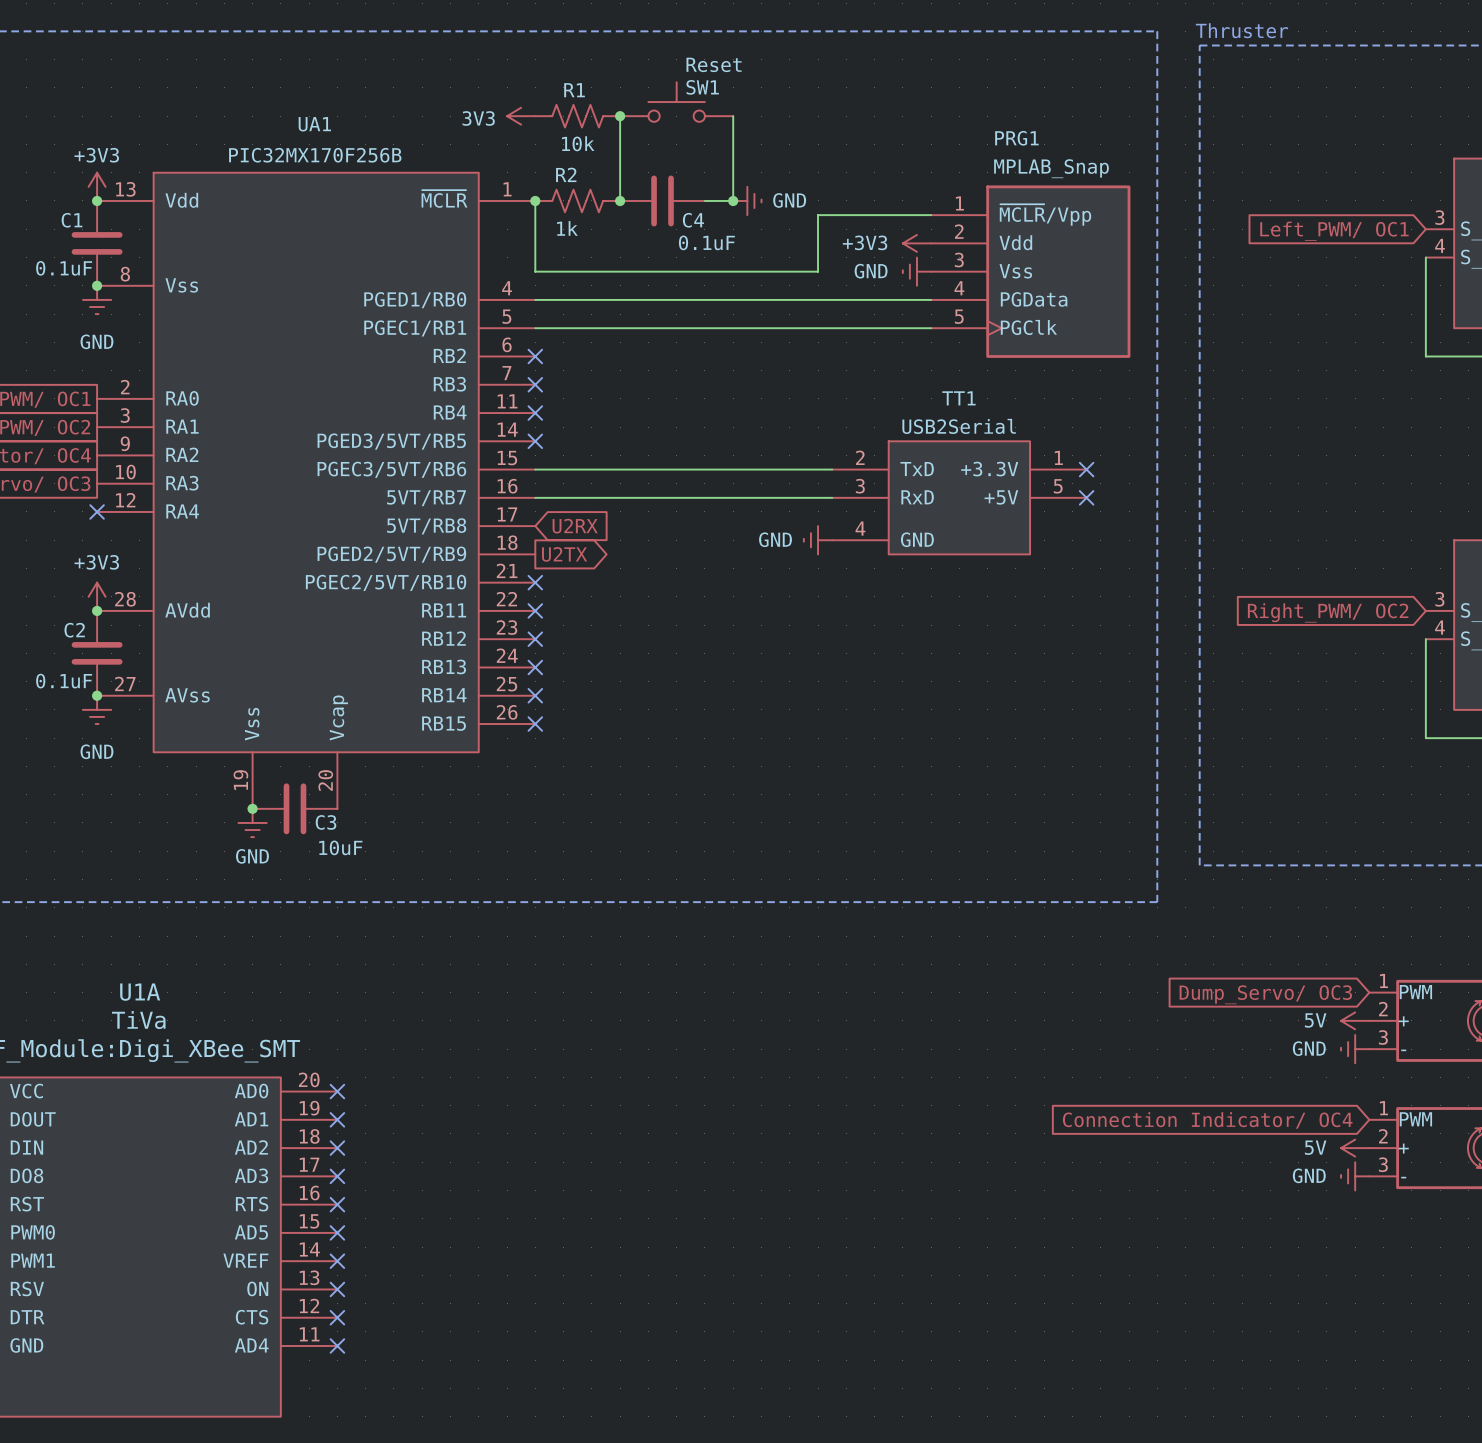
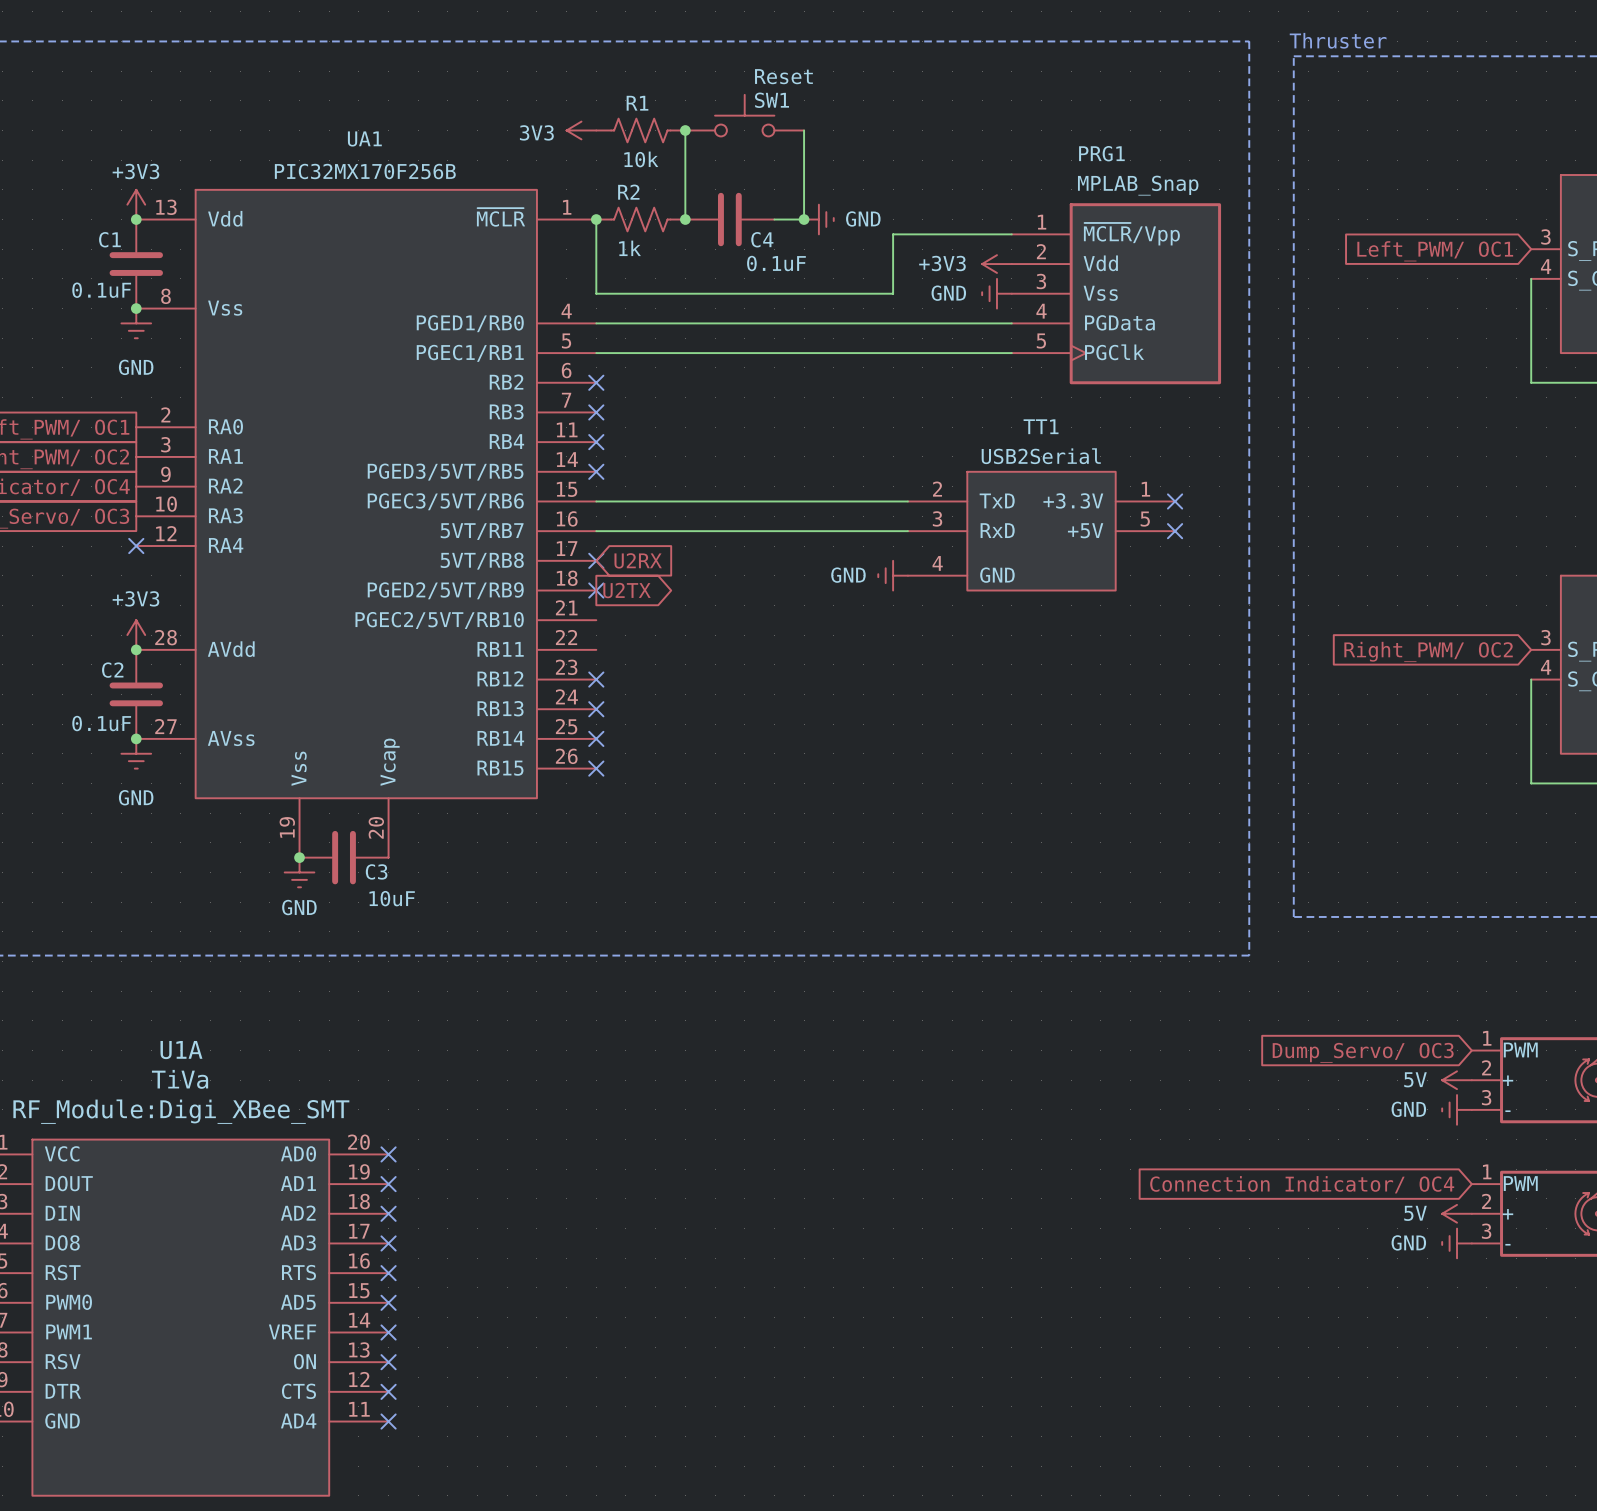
no-connect mark: none -> (596, 560)
no-connect mark: none -> (596, 590)
no-connect mark: (535, 582) -> none
no-connect mark: (535, 610) -> none

